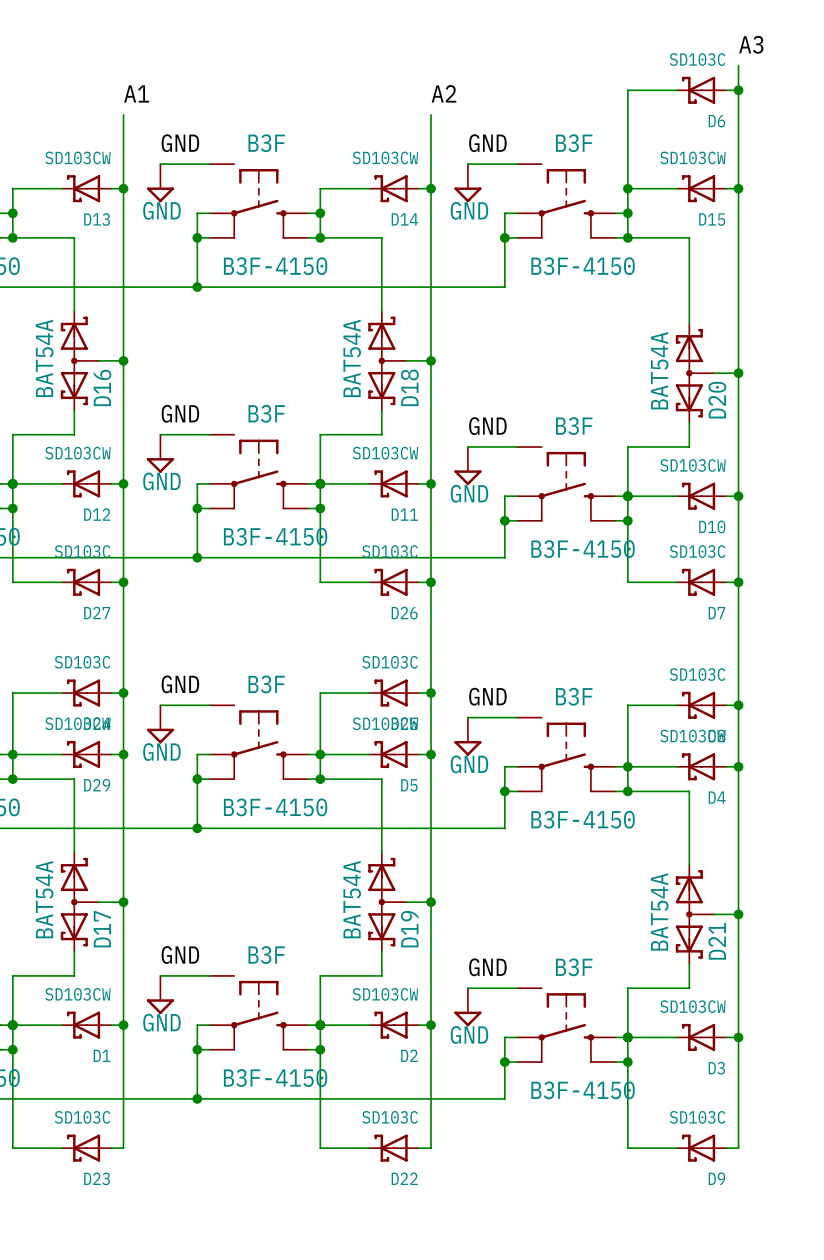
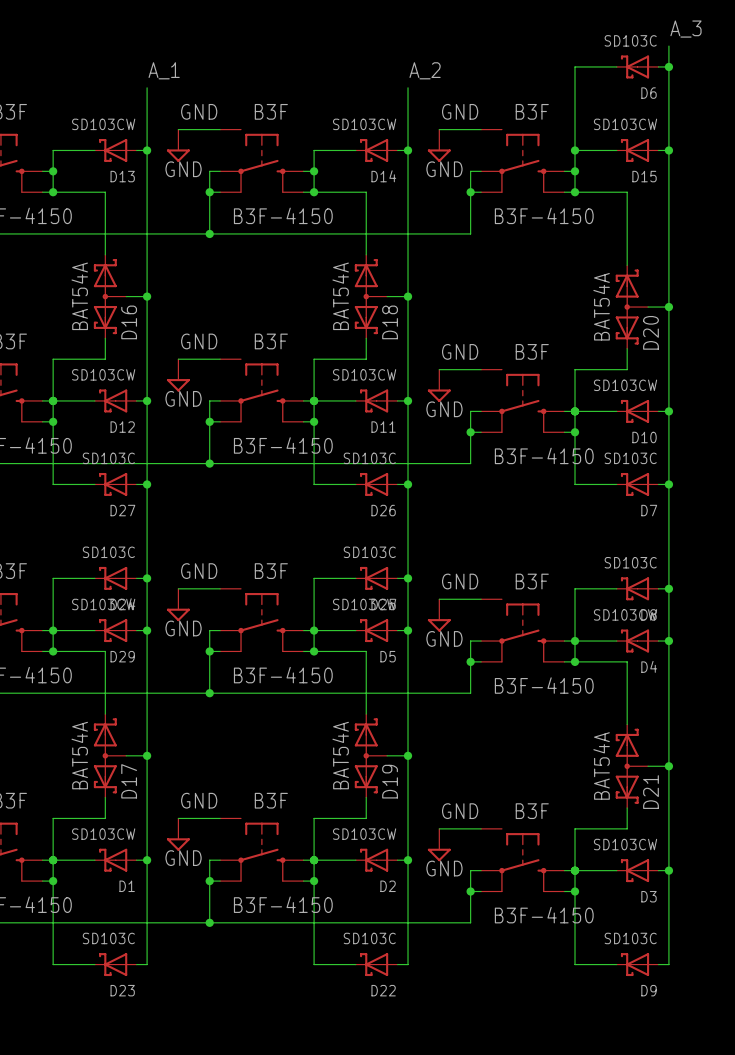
label: A3 (751, 44) -> A_3 (685, 29)
label: A1 (136, 93) -> A_1 (164, 70)
label: A2 (443, 93) -> A_2 (425, 70)

